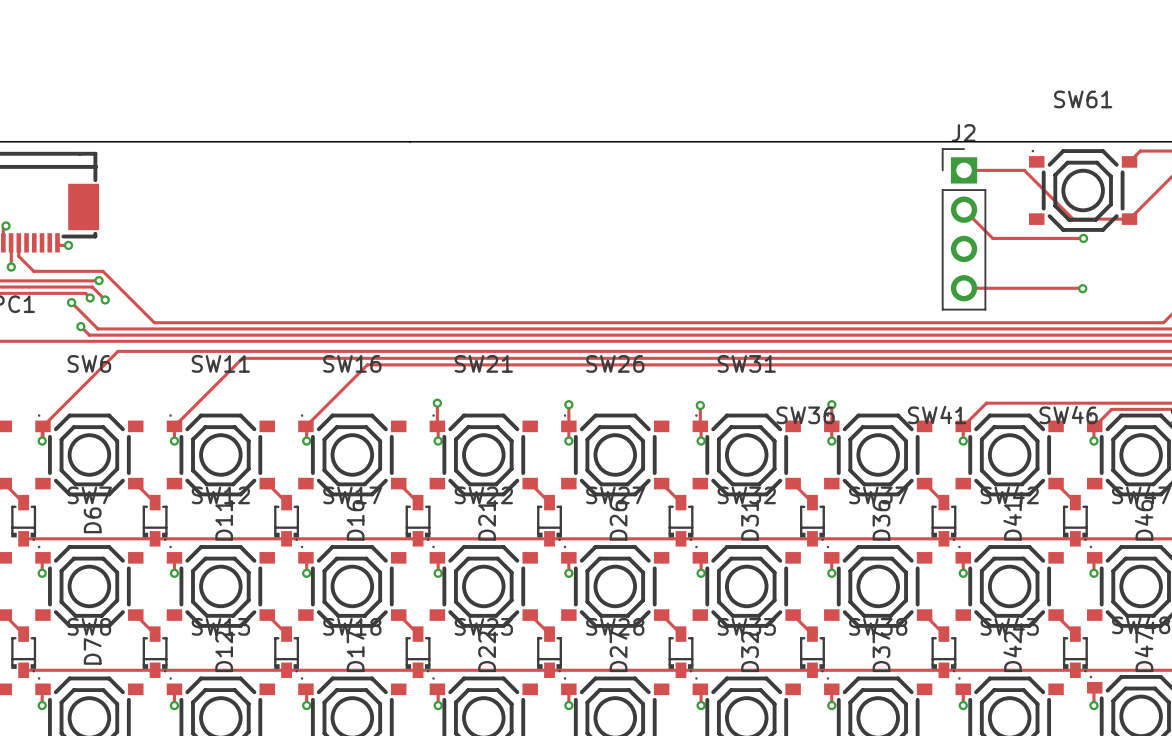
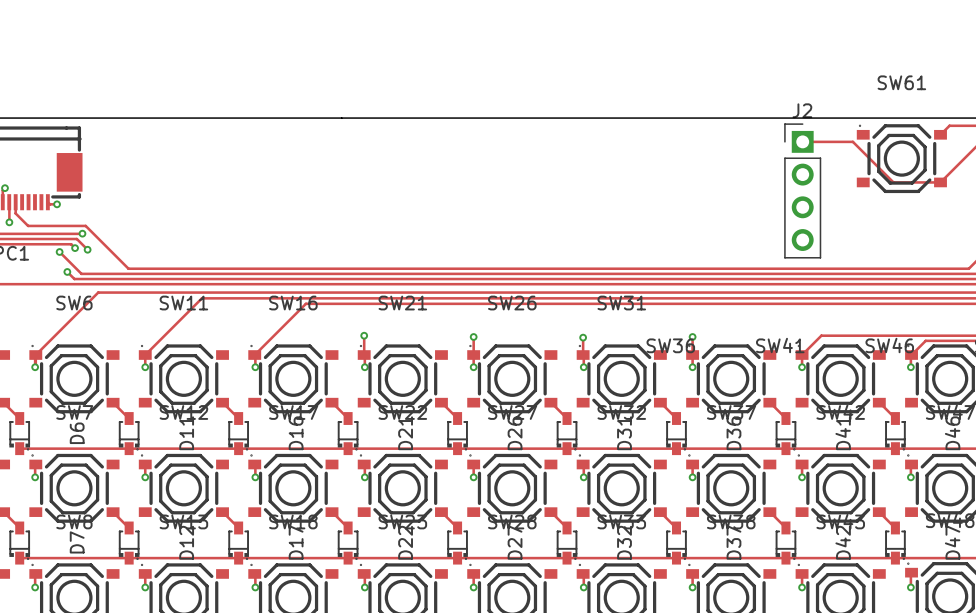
track: (964, 209) (992, 238) (1083, 238) -> none
via: (1083, 238) -> none
track: (964, 288) (1082, 288) -> none
via: (1082, 288) -> none

